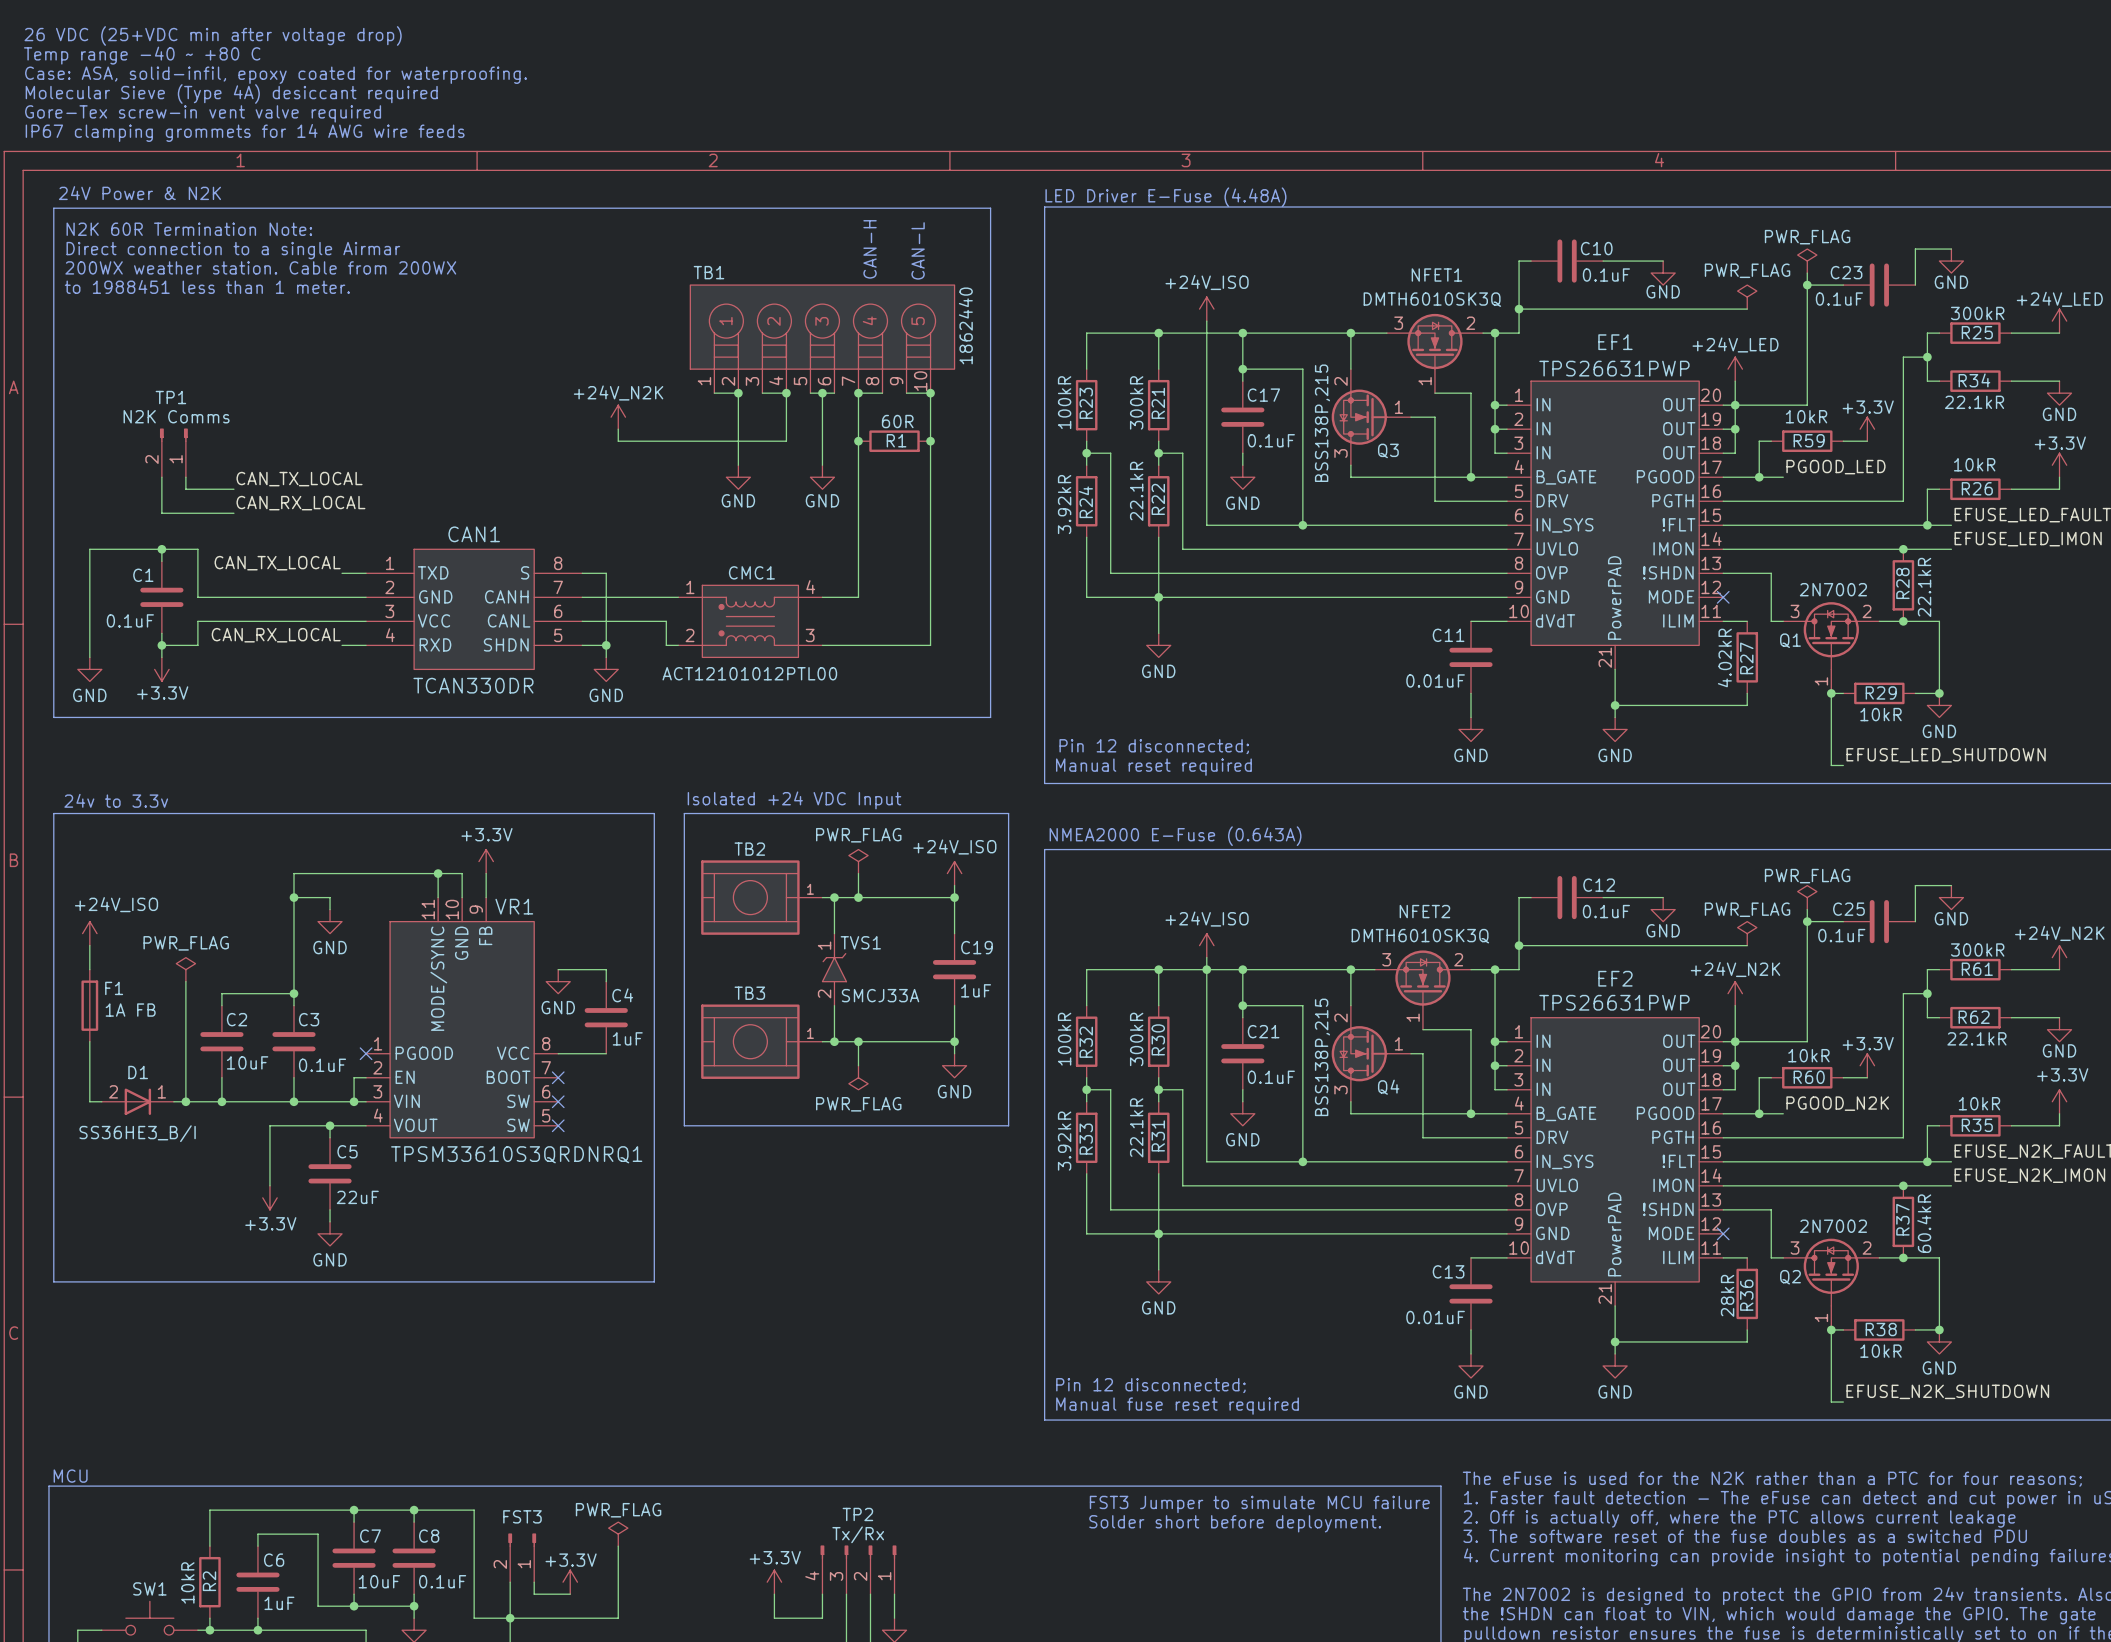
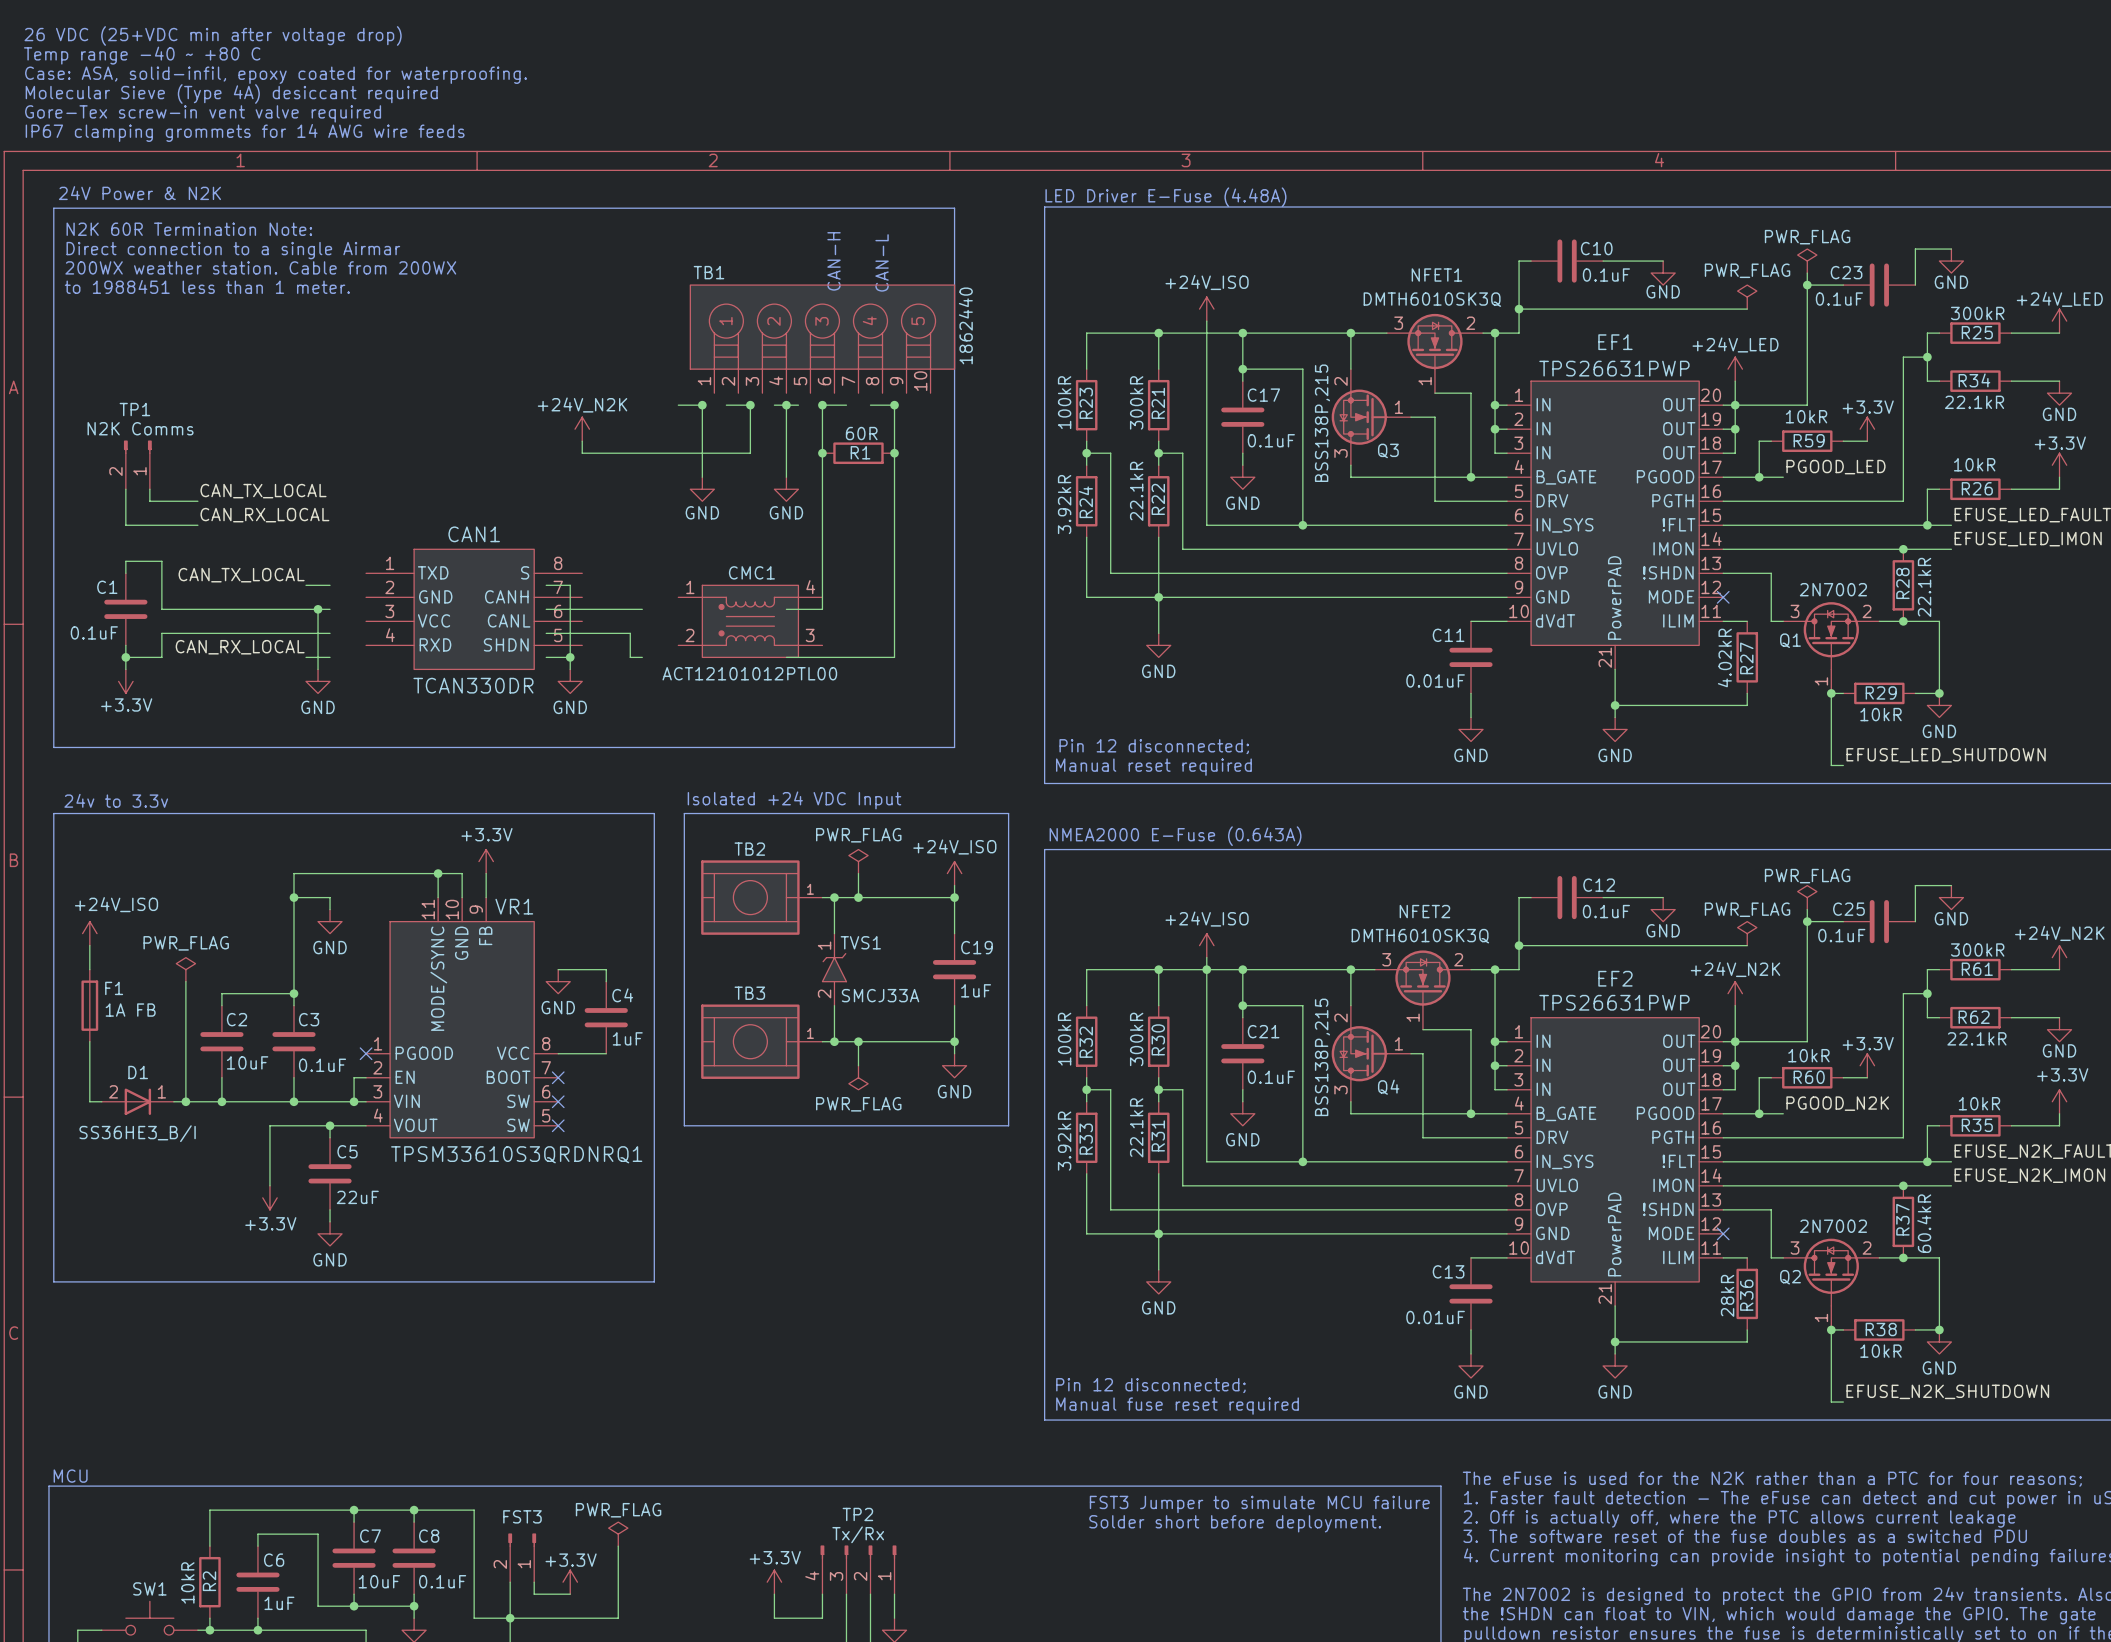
line: (954, 208) (990, 208) (990, 717) (53, 717) -> (954, 208) (954, 747) (53, 747) (53, 717)
text position: CAN-H (870, 249) -> CAN-H (834, 261)
text position: CAN-L (918, 250) -> CAN-L (882, 262)
wire: (714, 393) (738, 393) (738, 465) -> (678, 405) (702, 405) (702, 477)
junction position: (738, 393) -> (750, 405)
wire: (762, 393) (786, 393) (786, 405) -> none
junction position: (786, 393) -> (786, 405)
wire: (810, 393) (834, 393) -> (774, 405) (798, 405)
wire: (822, 393) (822, 405) -> (846, 405) (822, 405)
junction position: (822, 393) -> (822, 405)
junction: (858, 393) -> none
wire: (882, 393) (858, 393) (858, 597) (822, 597) -> none
wire: (906, 393) (930, 393) (930, 645) (822, 645) -> (870, 405) (894, 405) (894, 657) (786, 657)
junction: (930, 393) -> none
junction: none -> (702, 405)
wire: none -> (726, 405) (750, 405) (750, 453) (582, 453) (582, 441)
junction: none -> (894, 405)
power symbol position: +24V_N2K (618, 417) -> +24V_N2K (582, 429)
wire: (618, 429) (618, 441) (786, 441) -> (786, 477) (786, 441)
junction: (858, 441) -> none
R1 position: (894, 441) -> (858, 453)
junction: (930, 441) -> none
TP1 position: (173, 452) -> (137, 464)
junction: none -> (822, 453)
junction: none -> (894, 453)
wire: none -> (822, 465) (822, 609) (786, 609)
wire: (161, 477) (161, 513) (233, 513) -> (125, 489) (125, 525) (197, 525)
wire: (185, 477) (185, 489) (233, 489) -> (149, 489) (149, 501) (197, 501)
power symbol: GND (738, 477) -> none
power symbol: GND (822, 477) -> none
label position: CAN_TX_LOCAL (299, 479) -> CAN_TX_LOCAL (263, 491)
power symbol: none -> GND (702, 489)
power symbol: none -> GND (786, 489)
label position: CAN_RX_LOCAL (300, 503) -> CAN_RX_LOCAL (264, 515)
wire: (161, 549) (161, 561) -> none
junction: (161, 549) -> none
label position: CAN_TX_LOCAL (277, 563) -> CAN_TX_LOCAL (241, 575)
wire: none -> (125, 573) (125, 561) (161, 561) (161, 609) (330, 609)
wire: (342, 573) (366, 573) -> (306, 585) (330, 585)
wire: (582, 573) (606, 573) (606, 657) -> (546, 585) (570, 585) (570, 669)
C1 position: (161, 597) -> (125, 609)
wire: (366, 597) (197, 597) (197, 549) (89, 549) (89, 657) -> none
wire: (582, 597) (678, 597) -> (546, 609) (642, 609)
wire: none -> (318, 609) (318, 669)
junction: none -> (318, 609)
wire: (366, 621) (197, 621) (197, 645) (161, 645) -> none
wire: (582, 621) (666, 621) (666, 645) (678, 645) -> (546, 633) (630, 633) (630, 657) (642, 657)
wire: none -> (161, 633) (330, 633)
label position: CAN_RX_LOCAL (276, 635) -> CAN_RX_LOCAL (240, 647)
wire: none -> (125, 645) (125, 669)
junction position: (161, 645) -> (125, 657)
wire: (342, 645) (366, 645) -> (306, 657) (330, 657)
wire: (582, 645) (606, 645) -> (546, 657) (570, 657)
junction position: (606, 645) -> (570, 657)
wire: none -> (125, 657) (161, 657)
power symbol: GND (89, 669) -> none
power symbol position: +3.3V (161, 669) -> +3.3V (125, 681)
power symbol position: GND (606, 669) -> GND (570, 681)
power symbol: none -> GND (318, 681)

